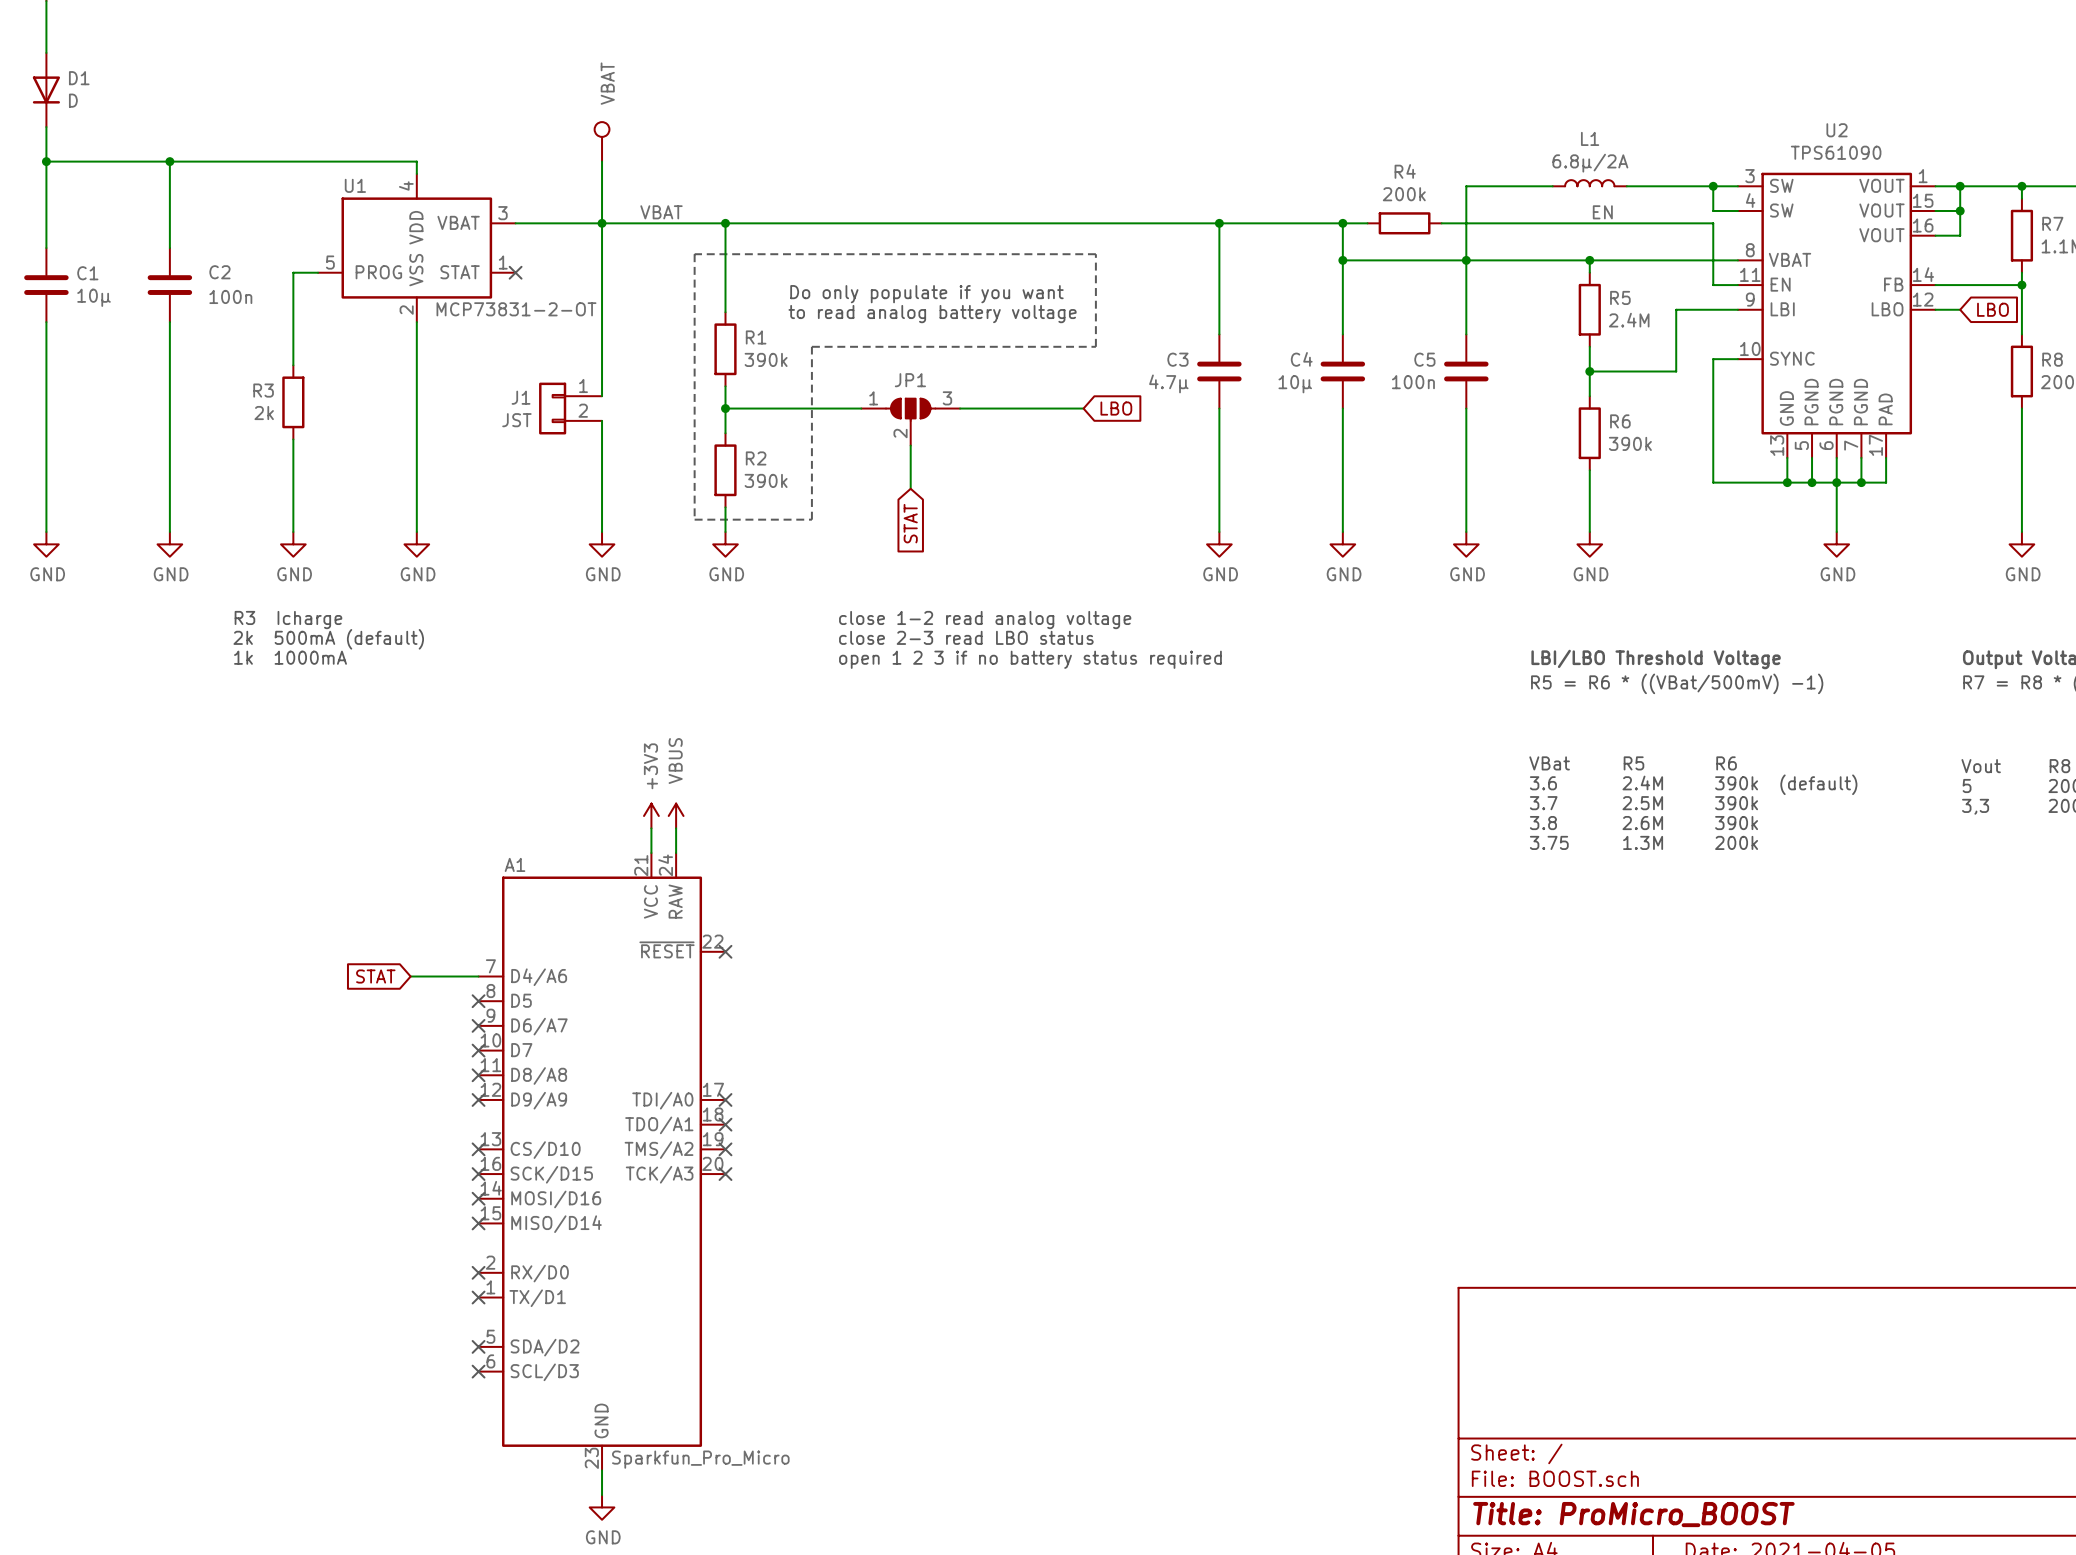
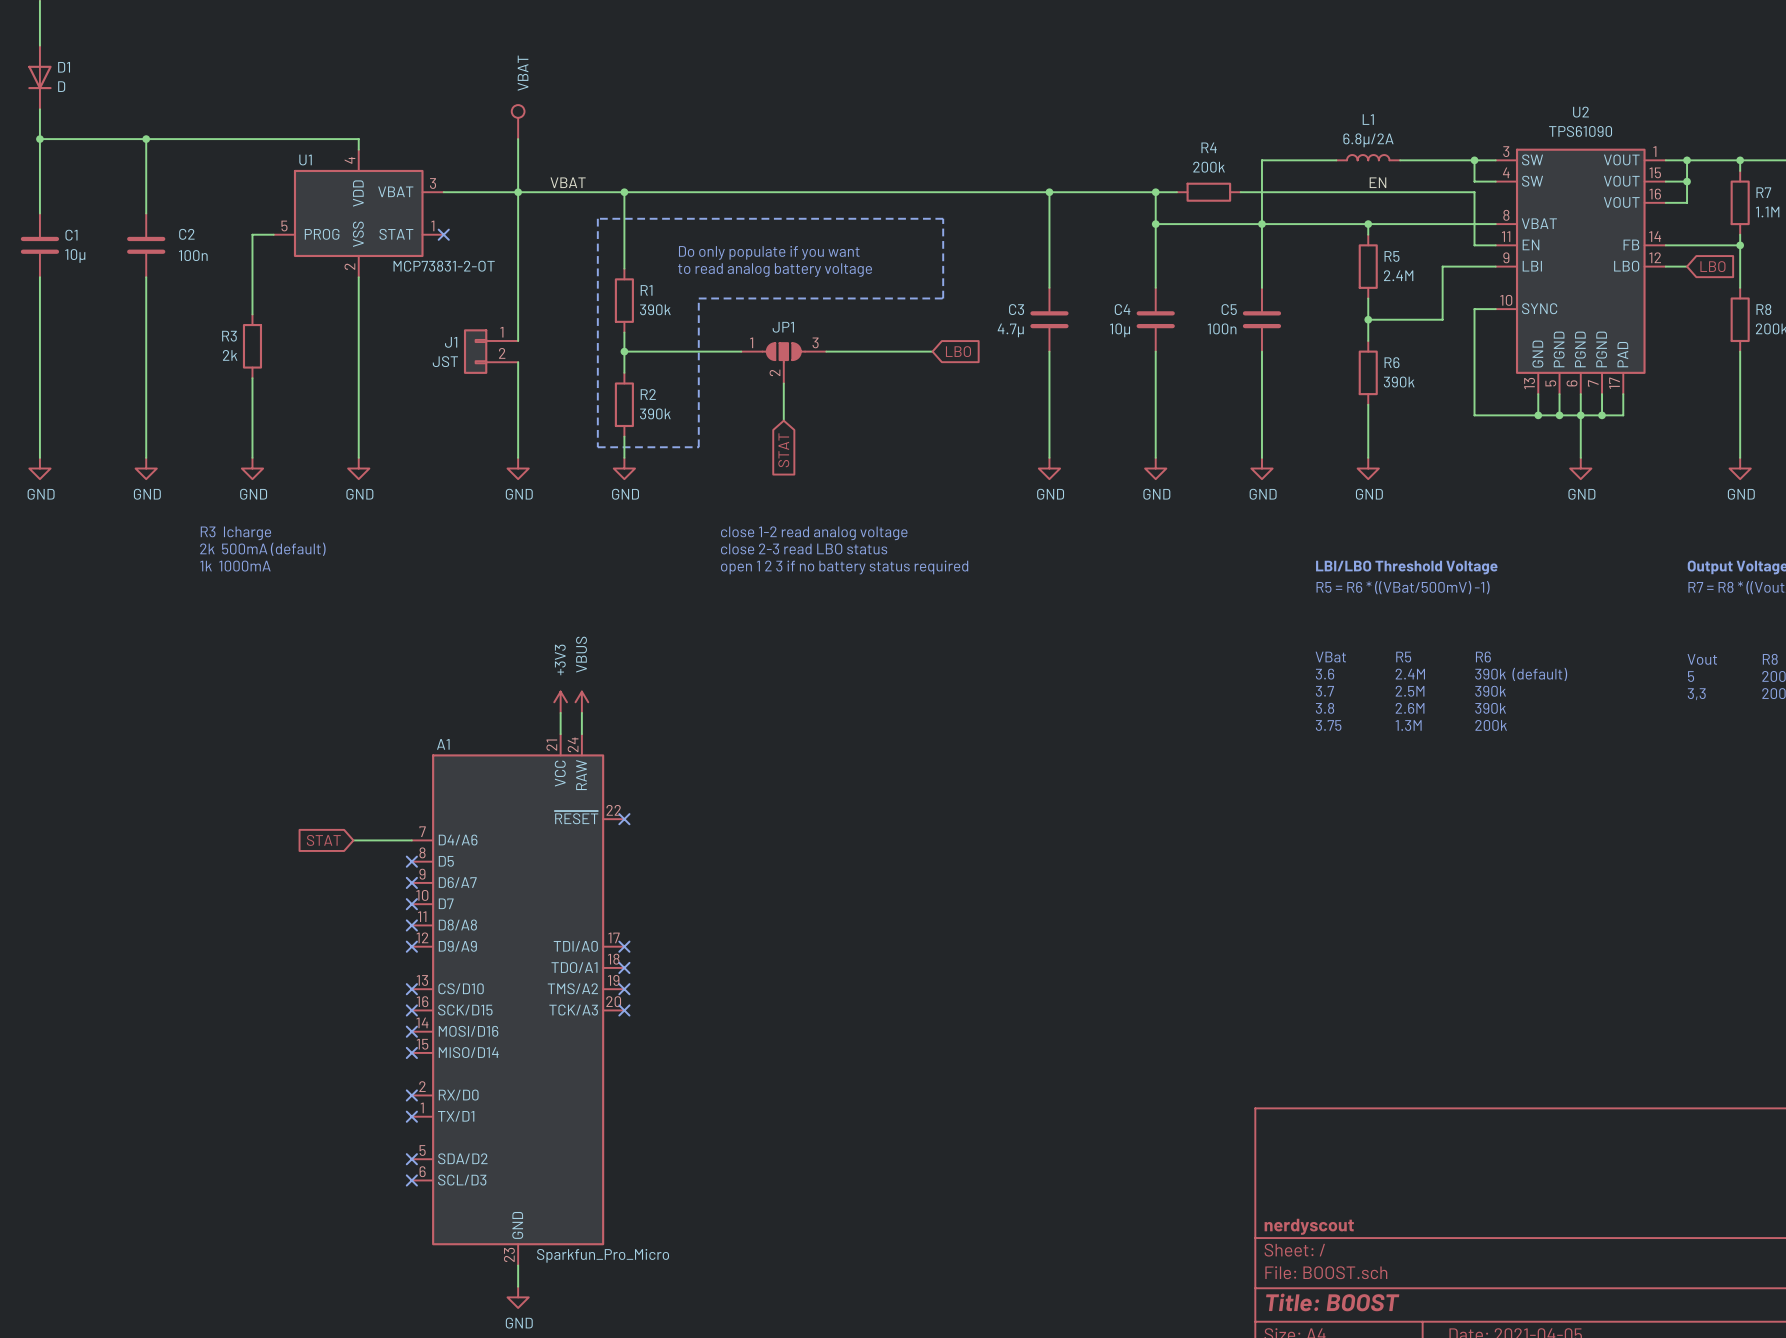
title block: none -> nerdyscout (1309, 1226)
title block: Title: ProMicro_BOOST (1633, 1514) -> Title: BOOST (1332, 1302)

